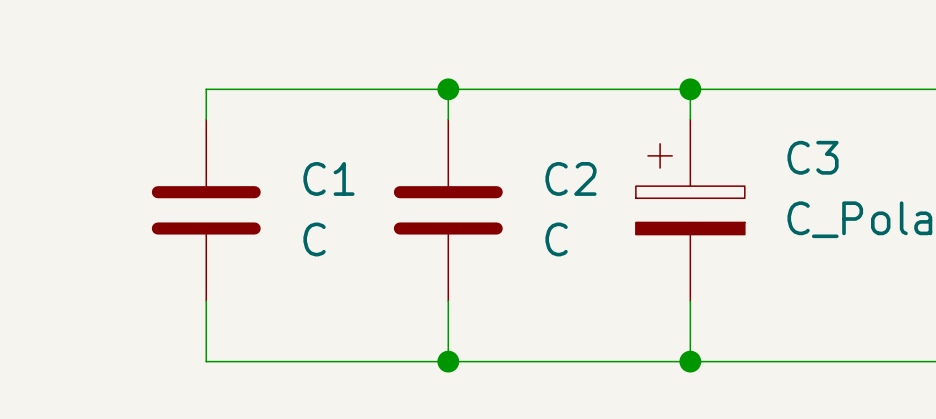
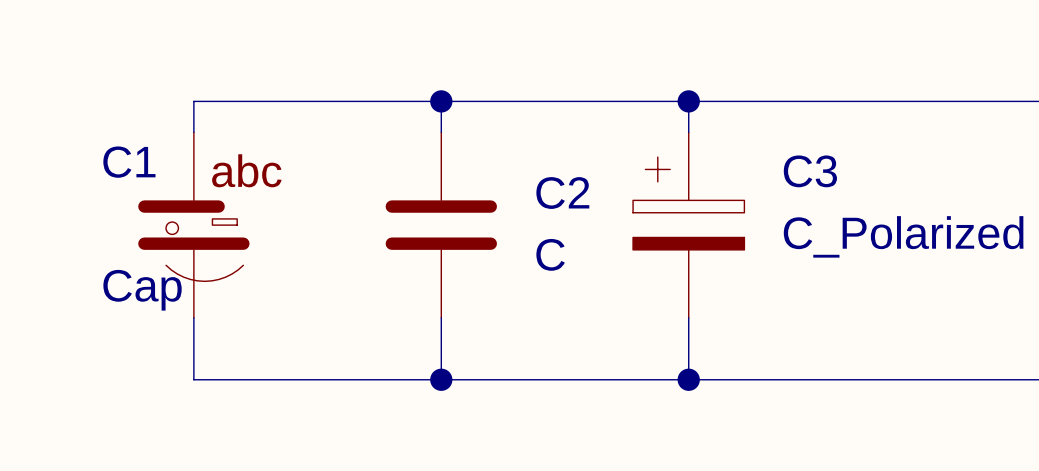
C1 symbol: [151, 119, 261, 302] -> [138, 132, 250, 318]
C1 name position: C1 (328, 178) -> C1 (129, 162)
C1 value: C (314, 239) -> Cap (142, 290)

